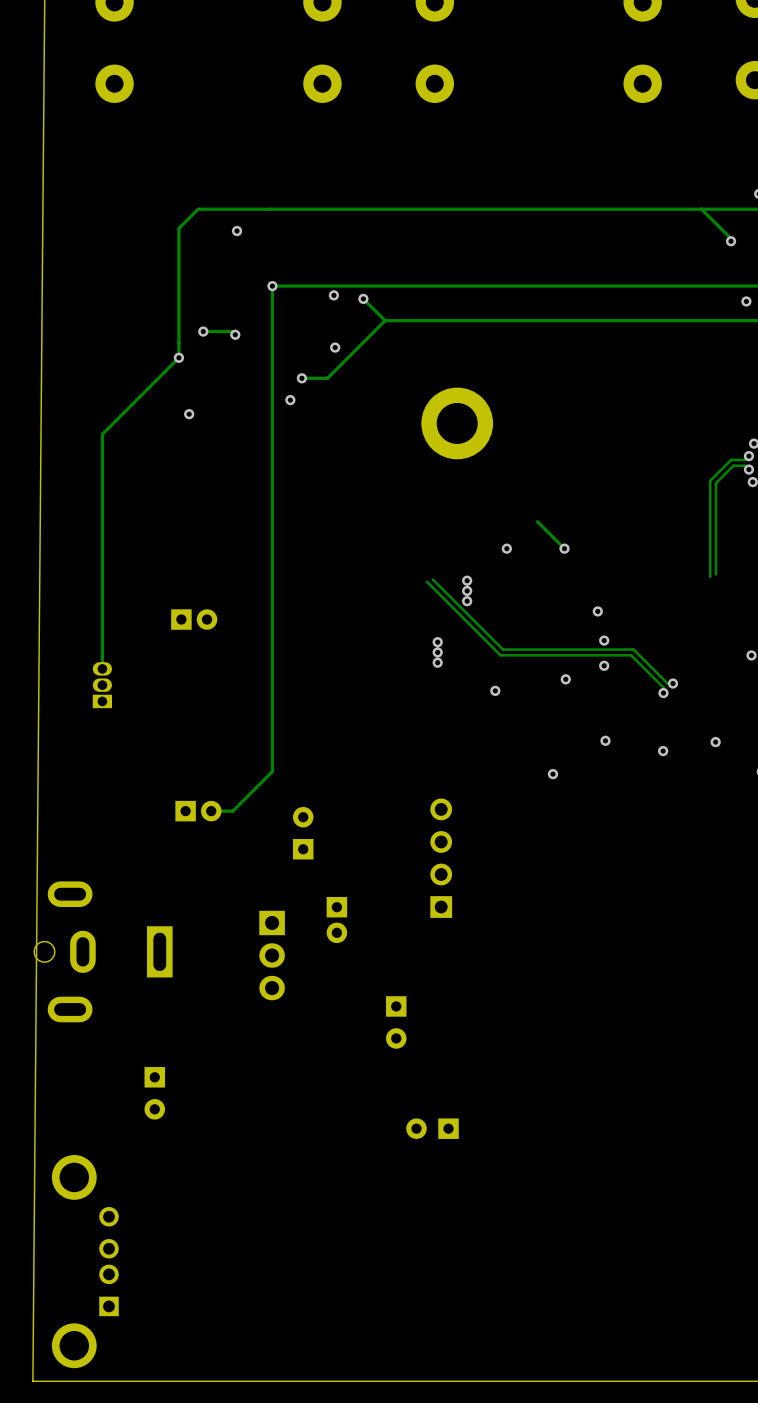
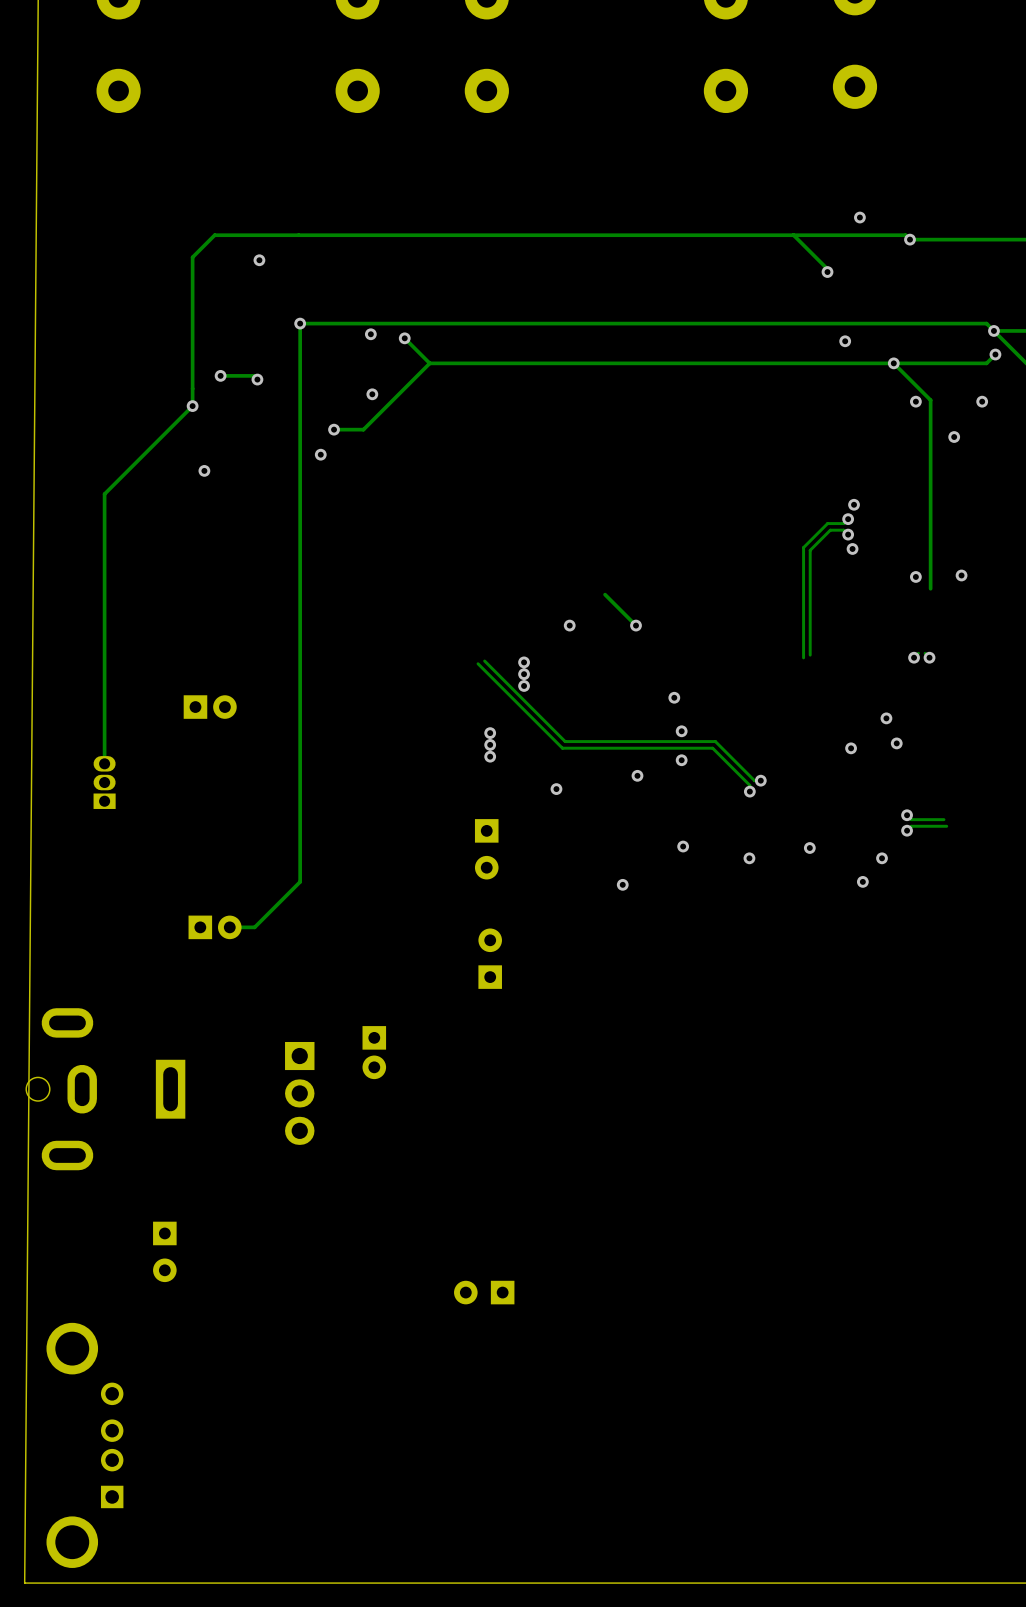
part: (457, 423) -> none
part: none -> (486, 849)
part: (303, 833) -> none
part: none -> (490, 958)
part: (441, 858) -> none
part: (396, 1022) -> none

